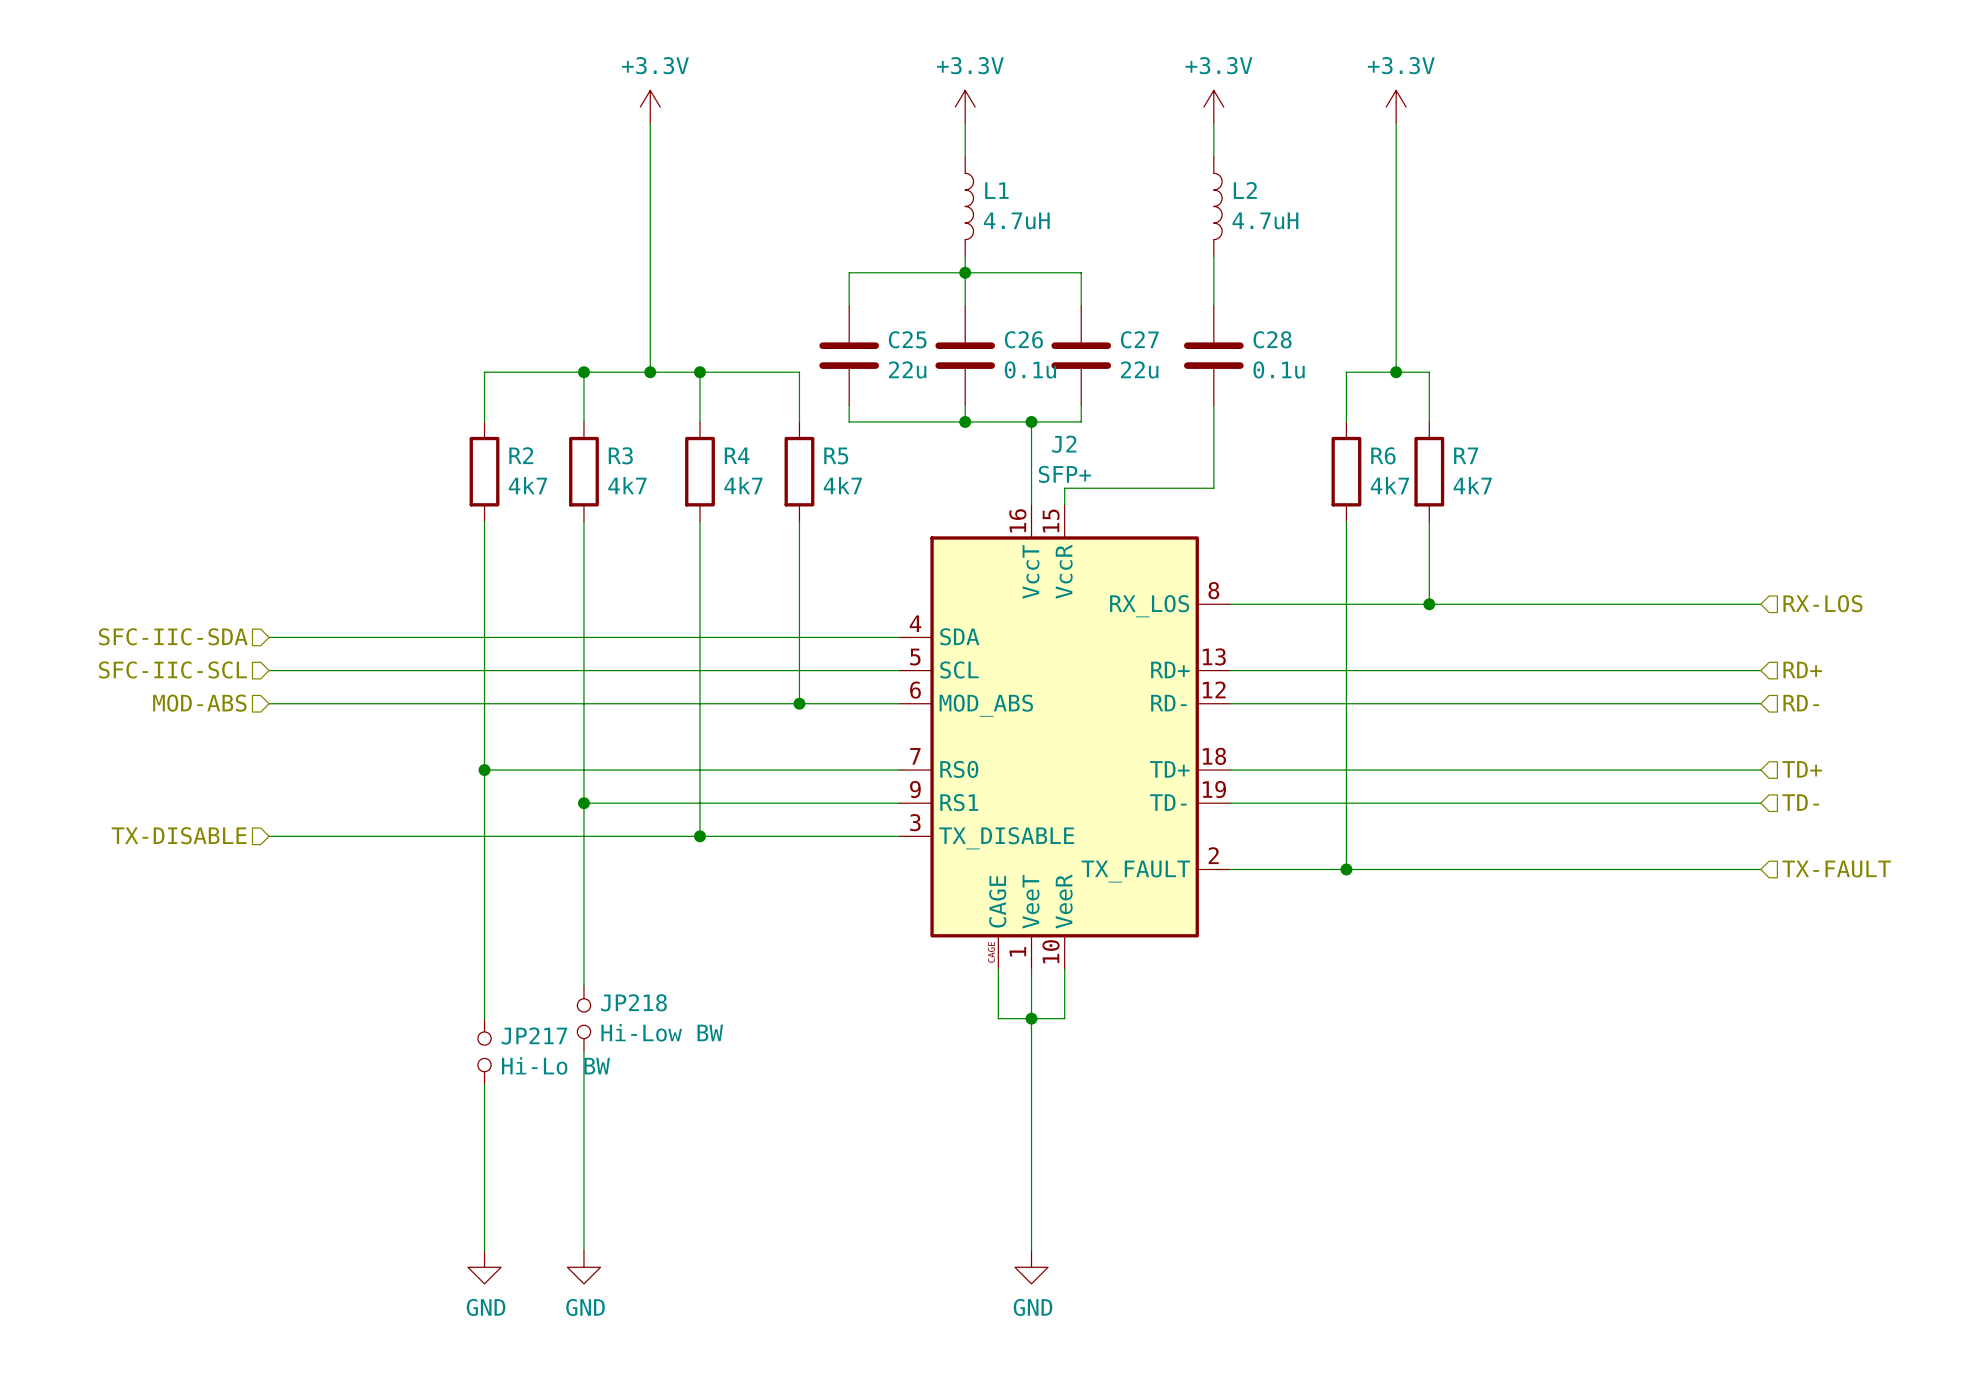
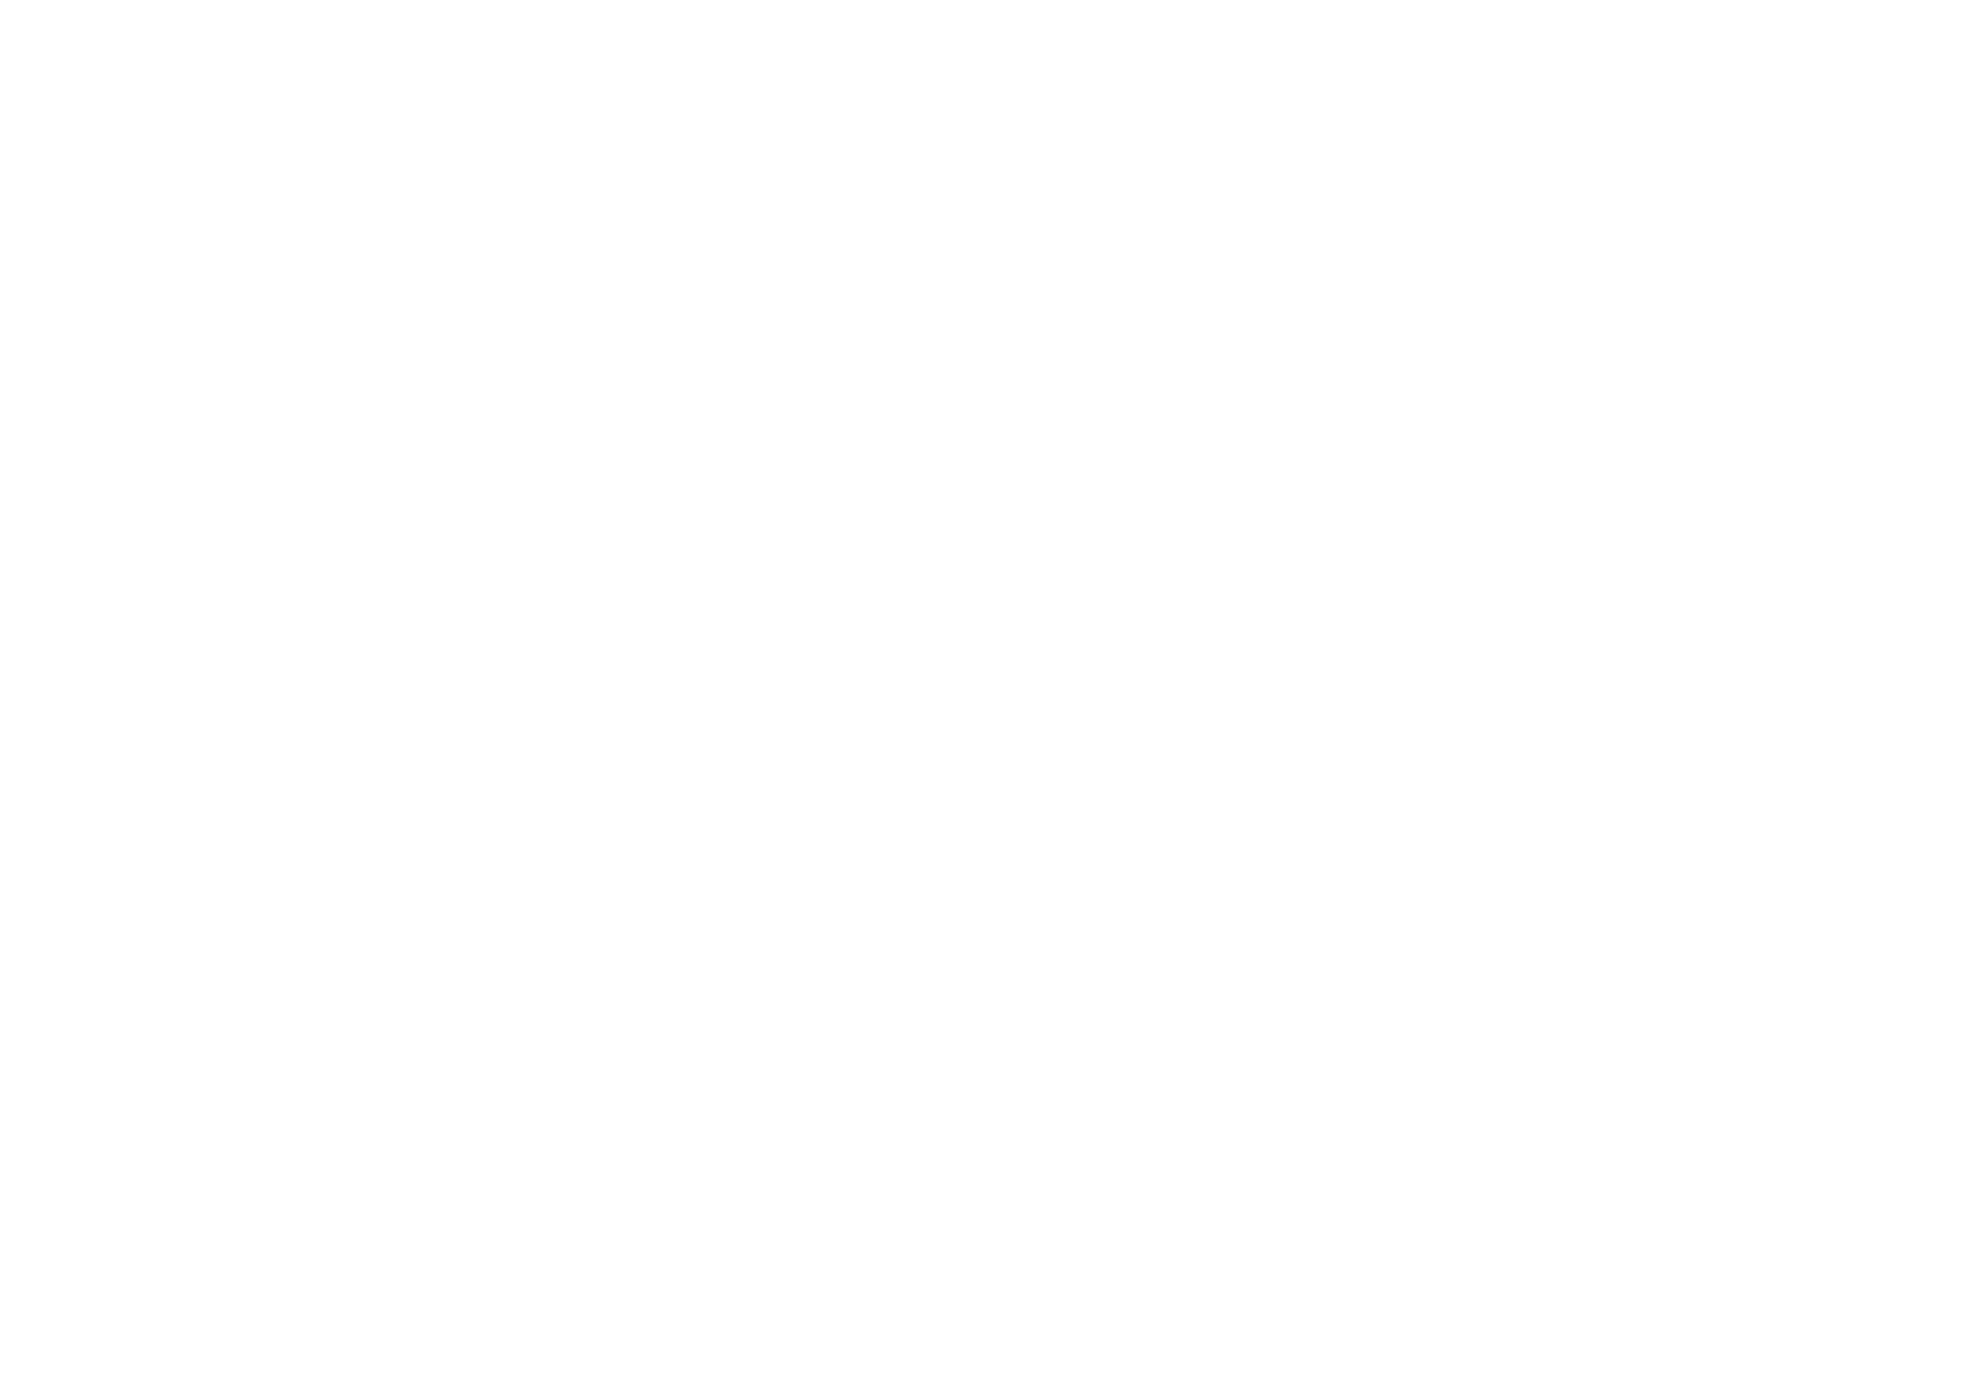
power symbol: +3.3V (650, 107) -> none
power symbol: +3.3V (965, 107) -> none
power symbol: +3.3V (1213, 107) -> none
power symbol: +3.3V (1396, 107) -> none
wire: (650, 123) (650, 372) -> none
wire: (965, 123) (965, 156) -> none
wire: (1213, 123) (1213, 156) -> none
wire: (1396, 123) (1396, 372) -> none
L1: 4.7uH (969, 206) -> none
L2: 4.7uH (1217, 206) -> none
wire: (965, 256) (965, 305) -> none
wire: (1213, 256) (1213, 305) -> none
junction: (965, 272) -> none
wire: (849, 305) (849, 272) (1081, 272) (1081, 305) -> none
C25: 22u (849, 355) -> none
C26: 0.1u (965, 355) -> none
C27: 22u (1081, 355) -> none
C28: 0.1u (1213, 355) -> none
wire: (583, 372) (583, 421) -> none
junction: (583, 372) -> none
junction: (650, 372) -> none
wire: (700, 372) (700, 421) -> none
junction: (700, 372) -> none
junction: (1396, 372) -> none
wire: (849, 405) (849, 421) (1081, 421) (1081, 405) -> none
wire: (965, 405) (965, 421) -> none
wire: (1213, 405) (1213, 488) (1064, 488) (1064, 504) -> none
wire: (484, 421) (484, 372) (799, 372) (799, 421) -> none
junction: (965, 421) -> none
wire: (1031, 421) (1031, 504) -> none
junction: (1031, 421) -> none
wire: (1346, 421) (1346, 372) (1429, 372) (1429, 421) -> none
R2: 4k7 (484, 471) -> none
R3: 4k7 (583, 471) -> none
R4: 4k7 (700, 471) -> none
R5: 4k7 (799, 471) -> none
R6: 4k7 (1346, 471) -> none
R7: 4k7 (1429, 471) -> none
wire: (484, 521) (484, 1018) -> none
wire: (583, 521) (583, 985) -> none
wire: (700, 521) (700, 836) -> none
wire: (799, 521) (799, 703) -> none
wire: (1346, 521) (1346, 869) -> none
wire: (1429, 521) (1429, 604) -> none
hierarchical label: RX-LOS (1822, 603) -> none
wire: (1230, 604) (1760, 604) -> none
junction: (1429, 604) -> none
hierarchical label: SFC-IIC-SDA (173, 636) -> none
wire: (269, 637) (898, 637) -> none
hierarchical label: SFC-IIC-SCL (172, 669) -> none
hierarchical label: RD+ (1802, 669) -> none
wire: (269, 670) (898, 670) -> none
wire: (1230, 670) (1760, 670) -> none
hierarchical label: MOD-ABS (199, 703) -> none
wire: (269, 703) (898, 703) -> none
junction: (799, 703) -> none
wire: (1230, 703) (1760, 703) -> none
hierarchical label: RD- (1801, 703) -> none
J2: SFP+ (1064, 736) -> none
hierarchical label: TD+ (1802, 769) -> none
wire: (484, 770) (898, 770) -> none
junction: (484, 770) -> none
wire: (1230, 770) (1760, 770) -> none
hierarchical label: TD- (1800, 802) -> none
wire: (583, 803) (898, 803) -> none
junction: (583, 803) -> none
wire: (1230, 803) (1760, 803) -> none
hierarchical label: TX-DISABLE (179, 835) -> none
wire: (269, 836) (898, 836) -> none
junction: (700, 836) -> none
wire: (1230, 869) (1760, 869) -> none
junction: (1346, 869) -> none
hierarchical label: TX-FAULT (1836, 869) -> none
wire: (998, 968) (998, 1018) (1064, 1018) (1064, 968) -> none
wire: (1031, 968) (1031, 1250) -> none
JP218: Hi-Low BW (583, 1018) -> none
junction: (1031, 1018) -> none
JP217: Hi-Lo BW (484, 1051) -> none
wire: (583, 1051) (583, 1250) -> none
wire: (484, 1084) (484, 1250) -> none
power symbol: GND (484, 1267) -> none
power symbol: GND (583, 1267) -> none
power symbol: GND (1031, 1267) -> none

